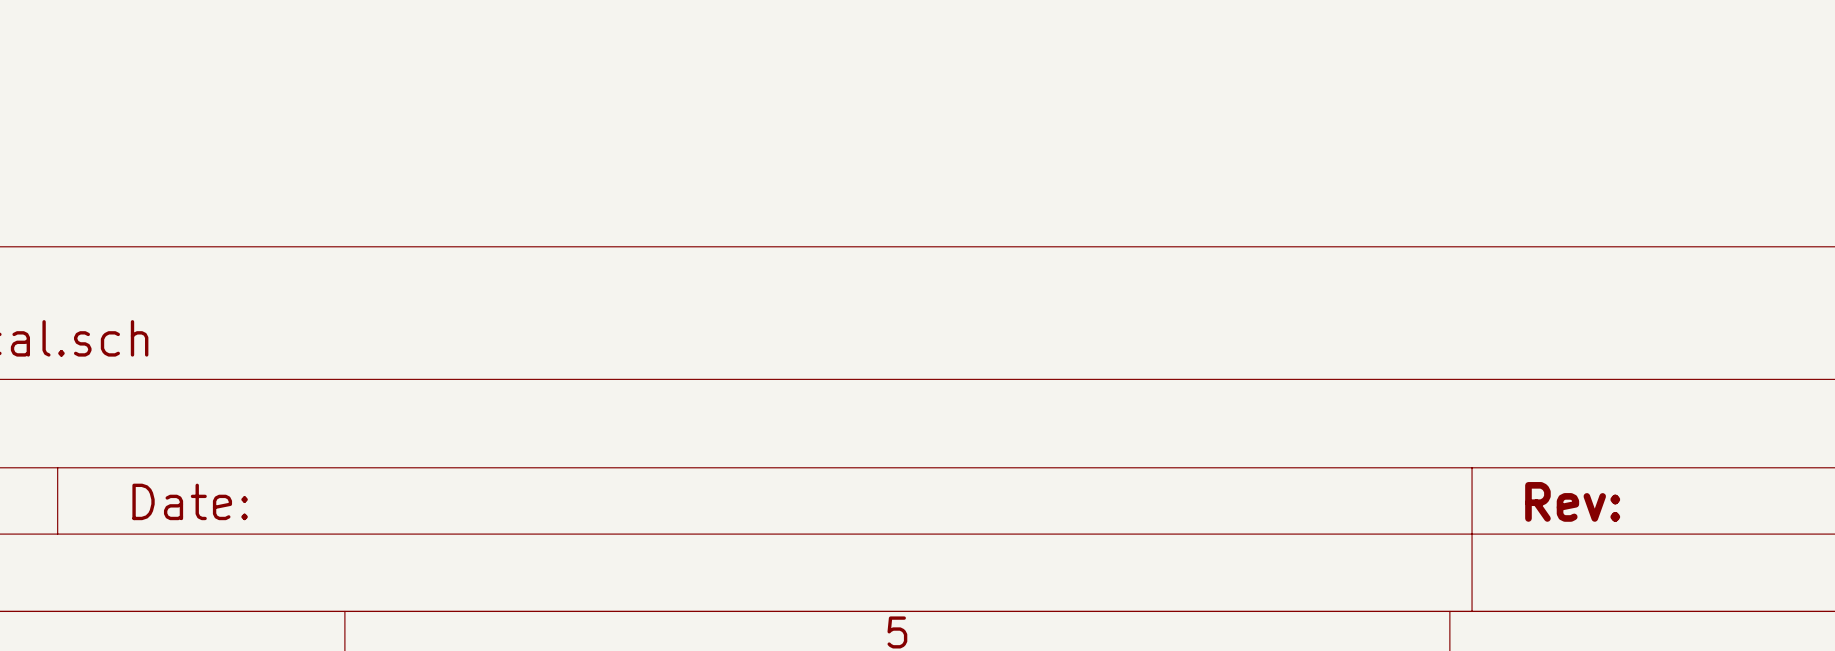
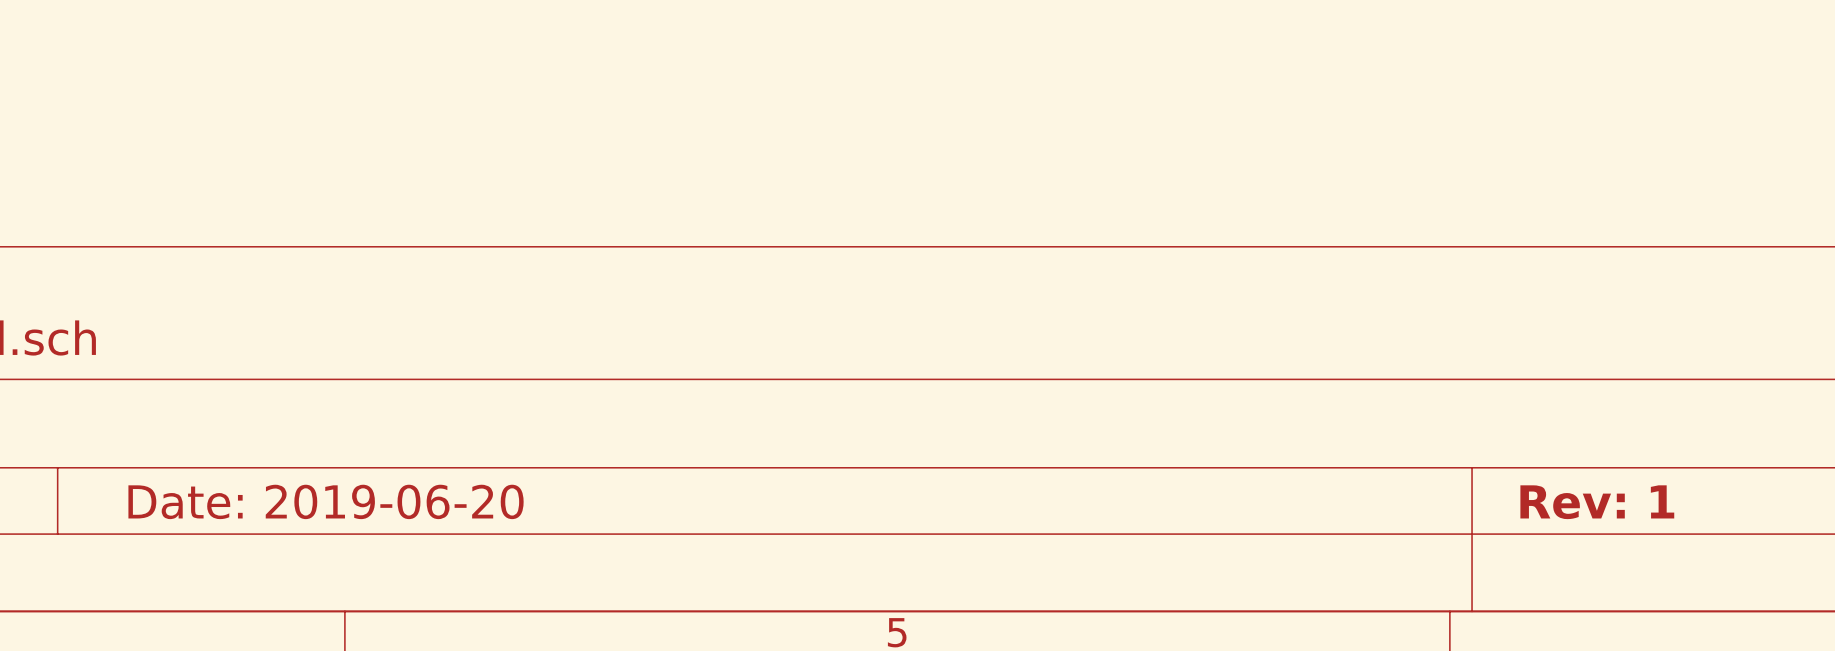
title block: Date: (190, 501) -> Date: 2019-06-20 (326, 501)
title block: Rev: (1572, 501) -> Rev: 1 (1597, 502)

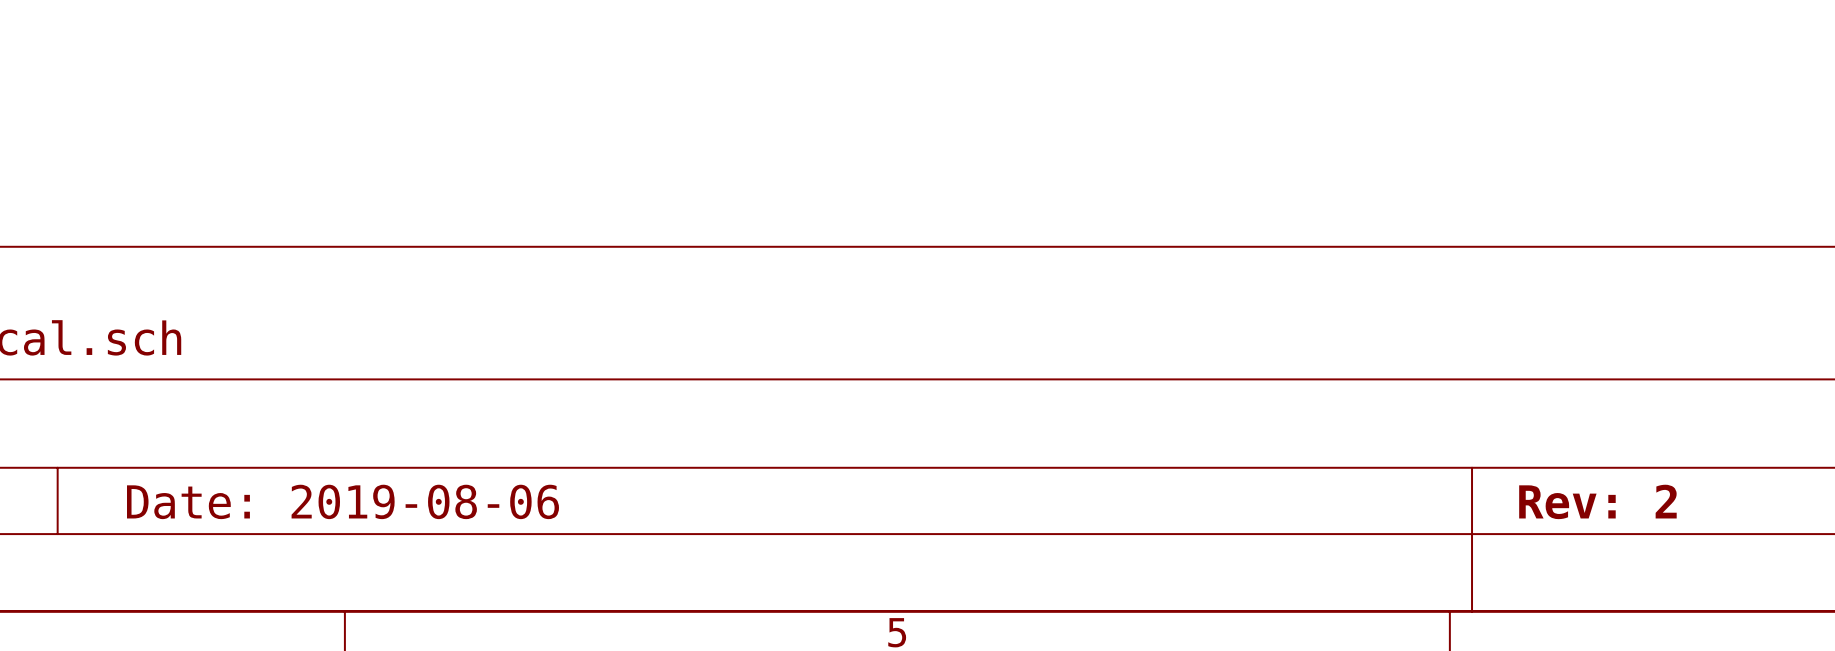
title block: Date: 2019-06-20 (326, 501) -> Date: 2019-08-06 (343, 501)
title block: Rev: 1 (1597, 502) -> Rev: 2 (1597, 501)

